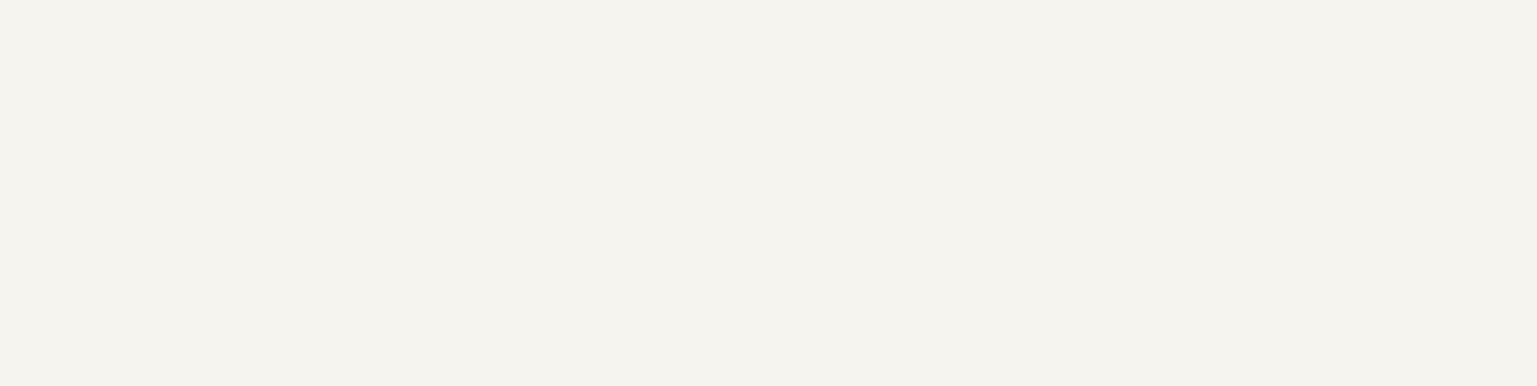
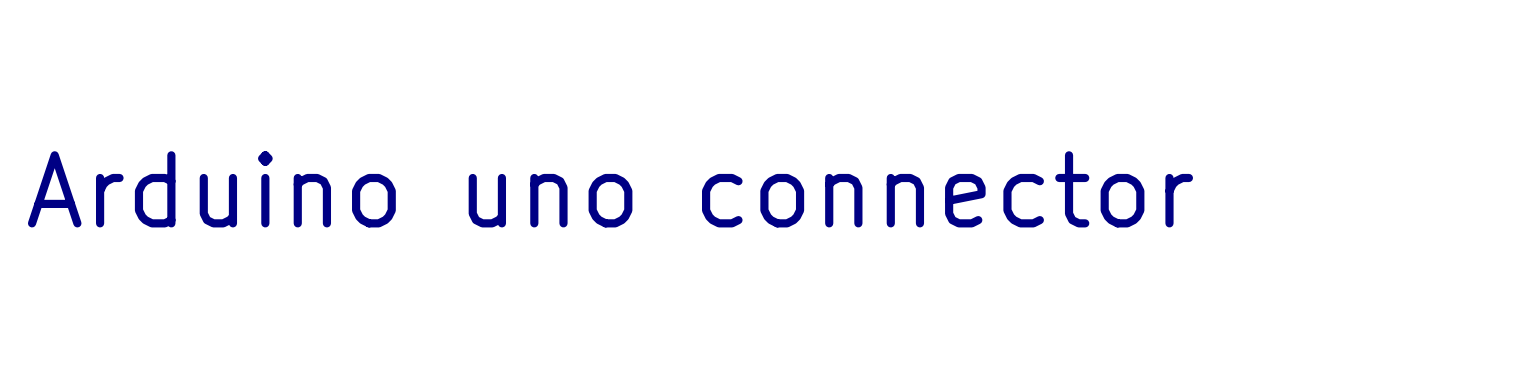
text: none -> Arduino uno connector (610, 189)

